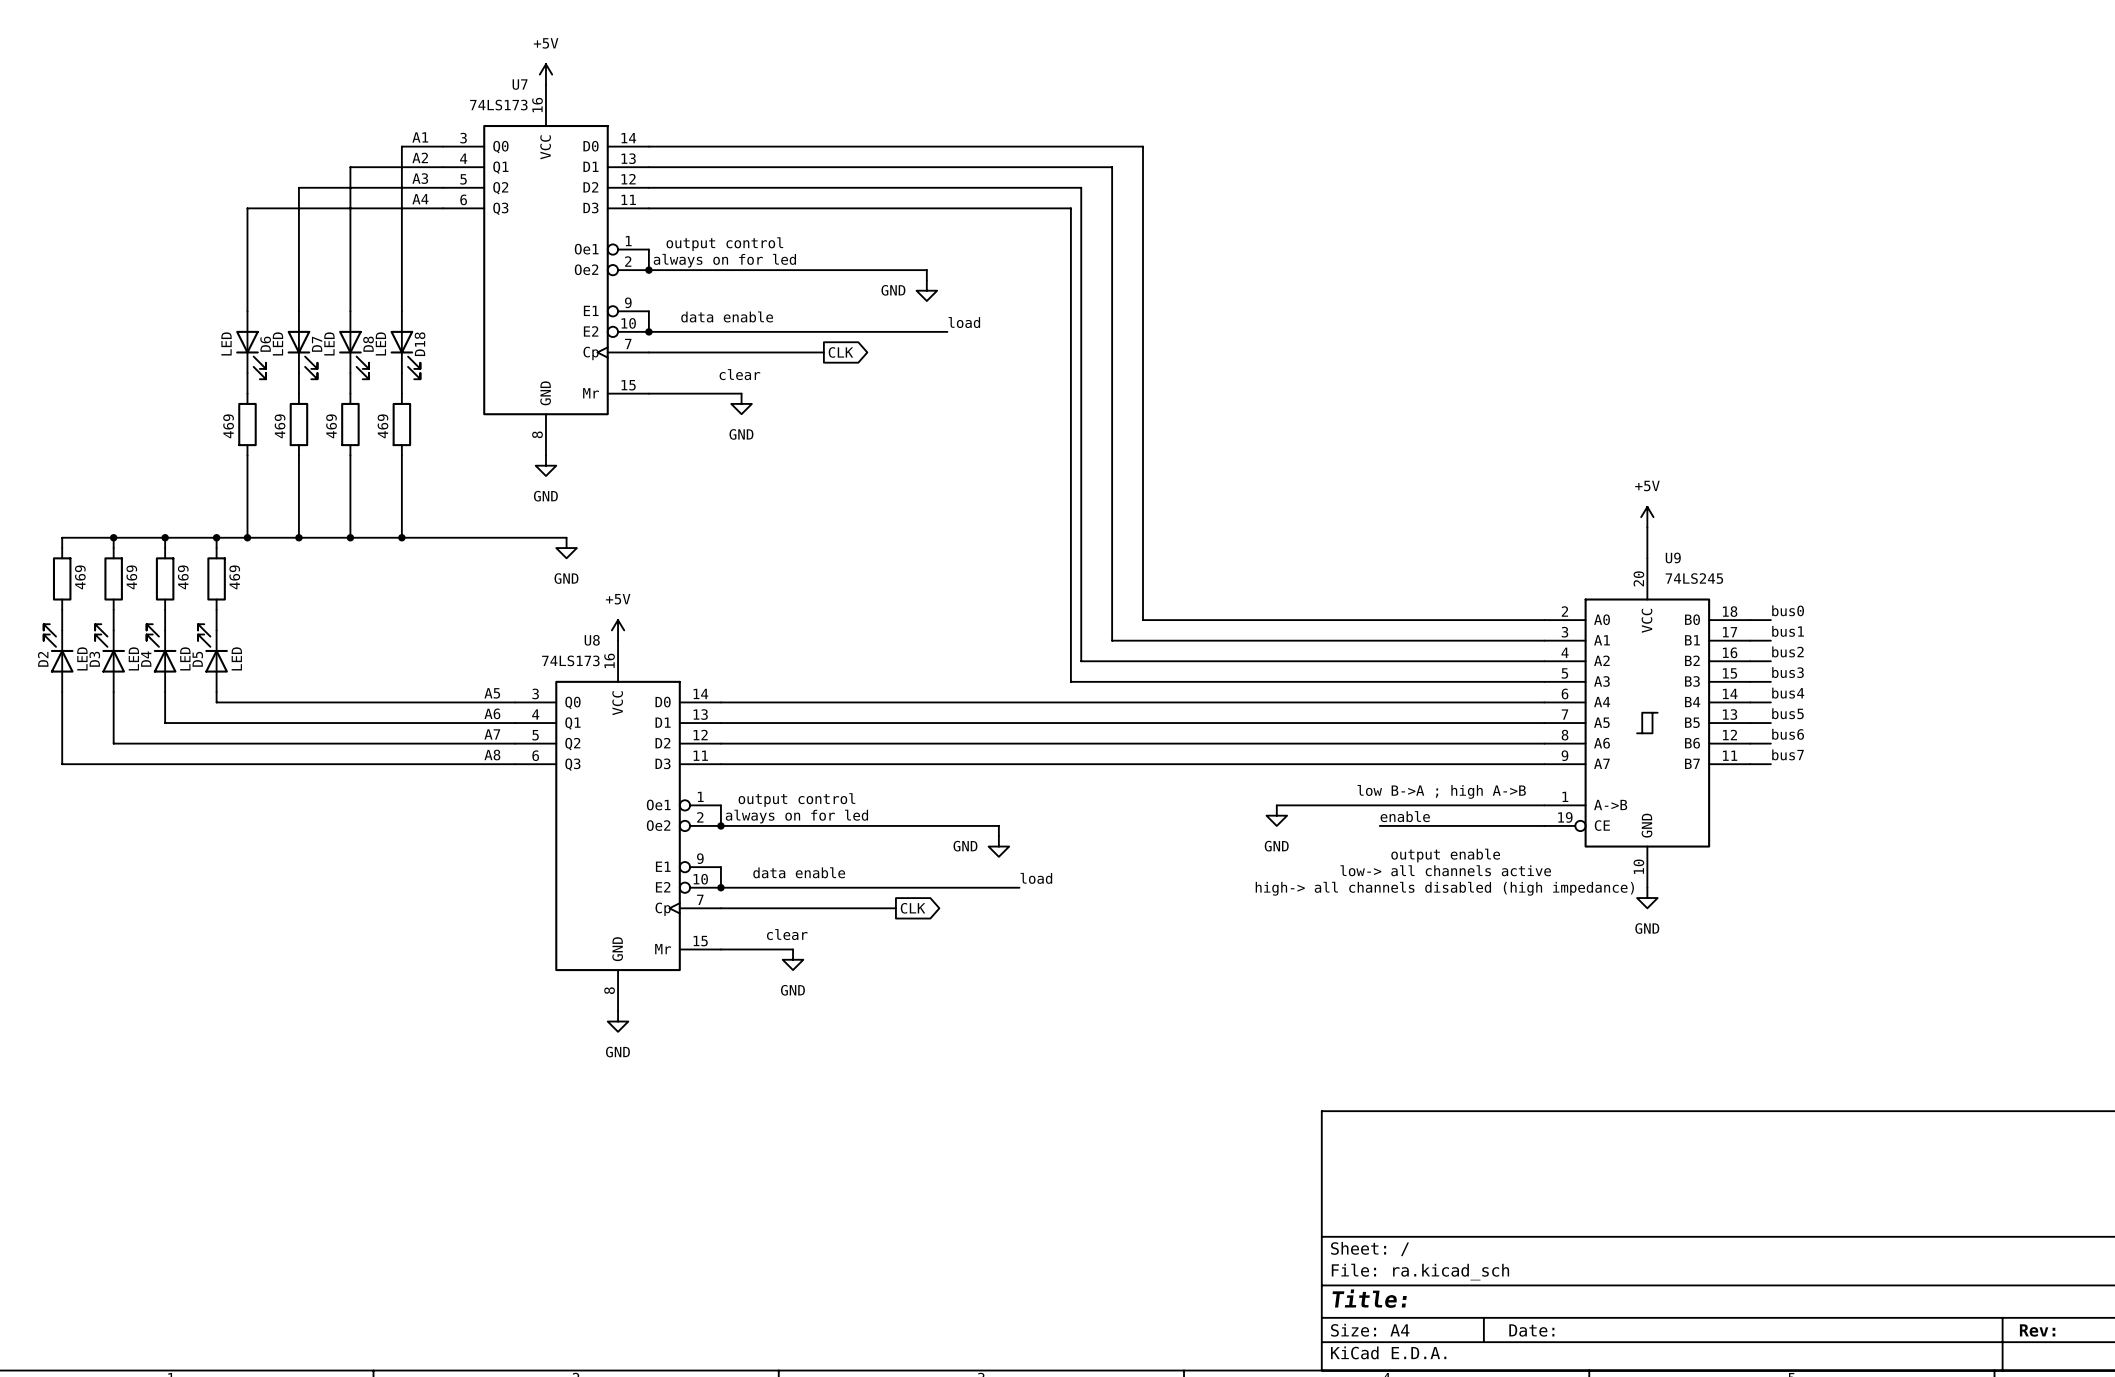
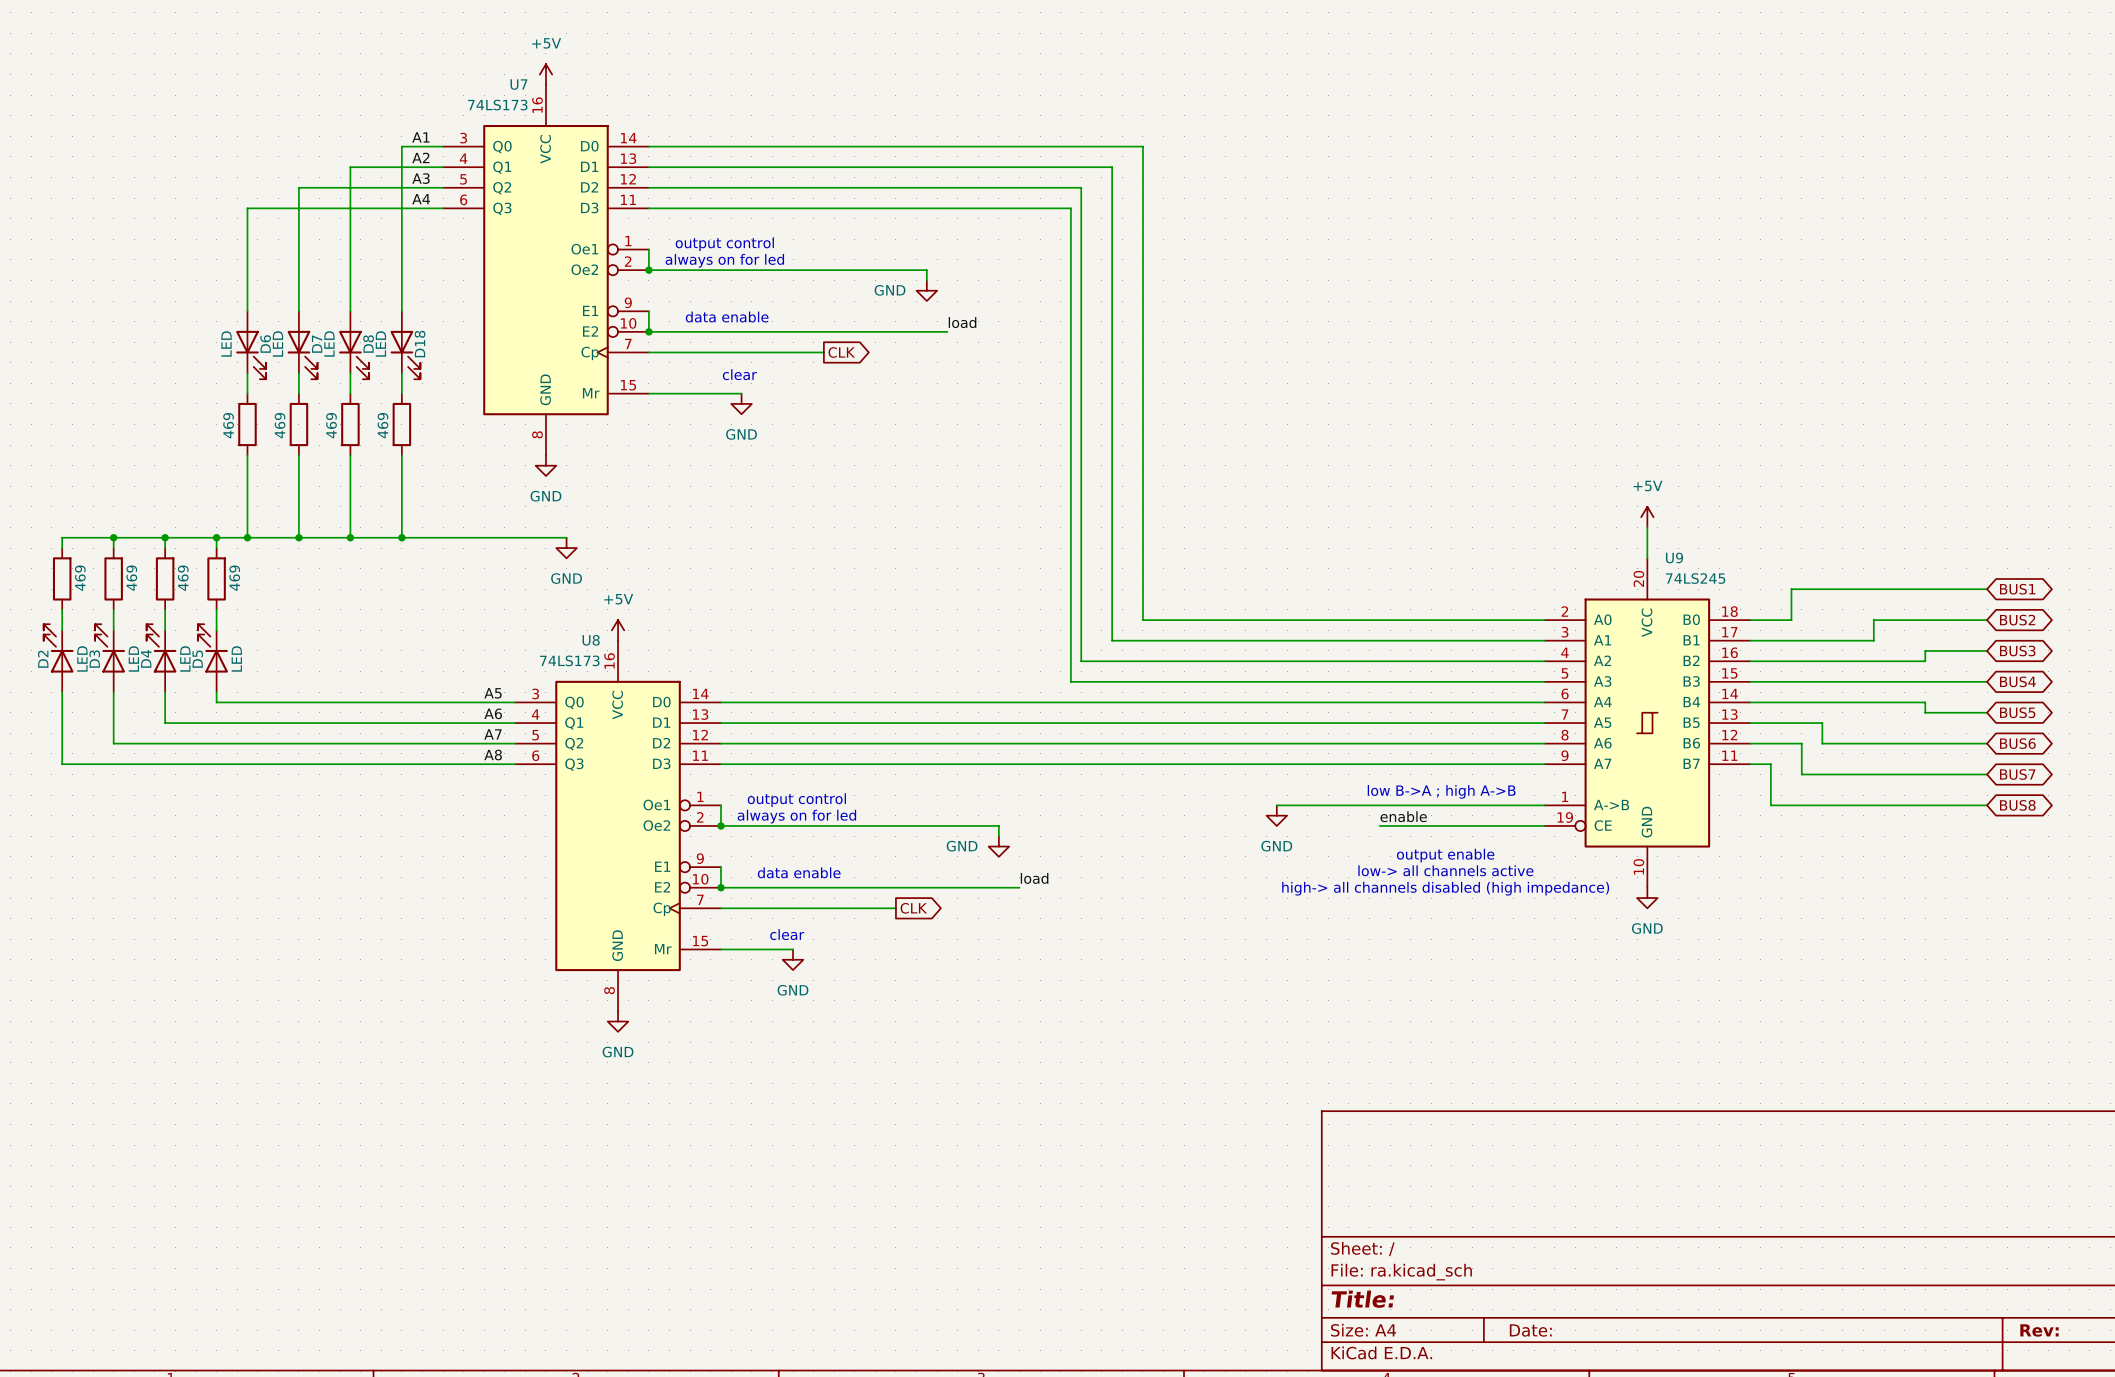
wire: none -> (1987, 589) (1791, 589) (1791, 620) (1770, 620)
global label: none -> BUS1 (2017, 589)
label: bus0 (1788, 610) -> none
wire: none -> (1987, 620) (1873, 620) (1873, 640) (1770, 640)
global label: none -> BUS2 (2017, 620)
label: bus1 (1788, 631) -> none
wire: none -> (1987, 650) (1925, 650) (1925, 661) (1770, 661)
global label: none -> BUS3 (2017, 650)
label: bus2 (1787, 651) -> none
label: bus3 (1788, 672) -> none
wire: none -> (1770, 681) (1987, 681)
global label: none -> BUS4 (2017, 681)
label: bus4 (1788, 693) -> none
wire: none -> (1770, 702) (1925, 702) (1925, 712) (1987, 712)
global label: none -> BUS5 (2017, 712)
label: bus5 (1787, 713) -> none
wire: none -> (1770, 723) (1822, 723) (1822, 743) (1987, 743)
label: bus6 (1788, 734) -> none
wire: none -> (1770, 743) (1801, 743) (1801, 774) (1987, 774)
global label: none -> BUS6 (2017, 743)
label: bus7 (1788, 754) -> none
wire: none -> (1770, 764) (1770, 805) (1987, 805)
global label: none -> BUS7 (2017, 774)
global label: none -> BUS8 (2017, 805)

